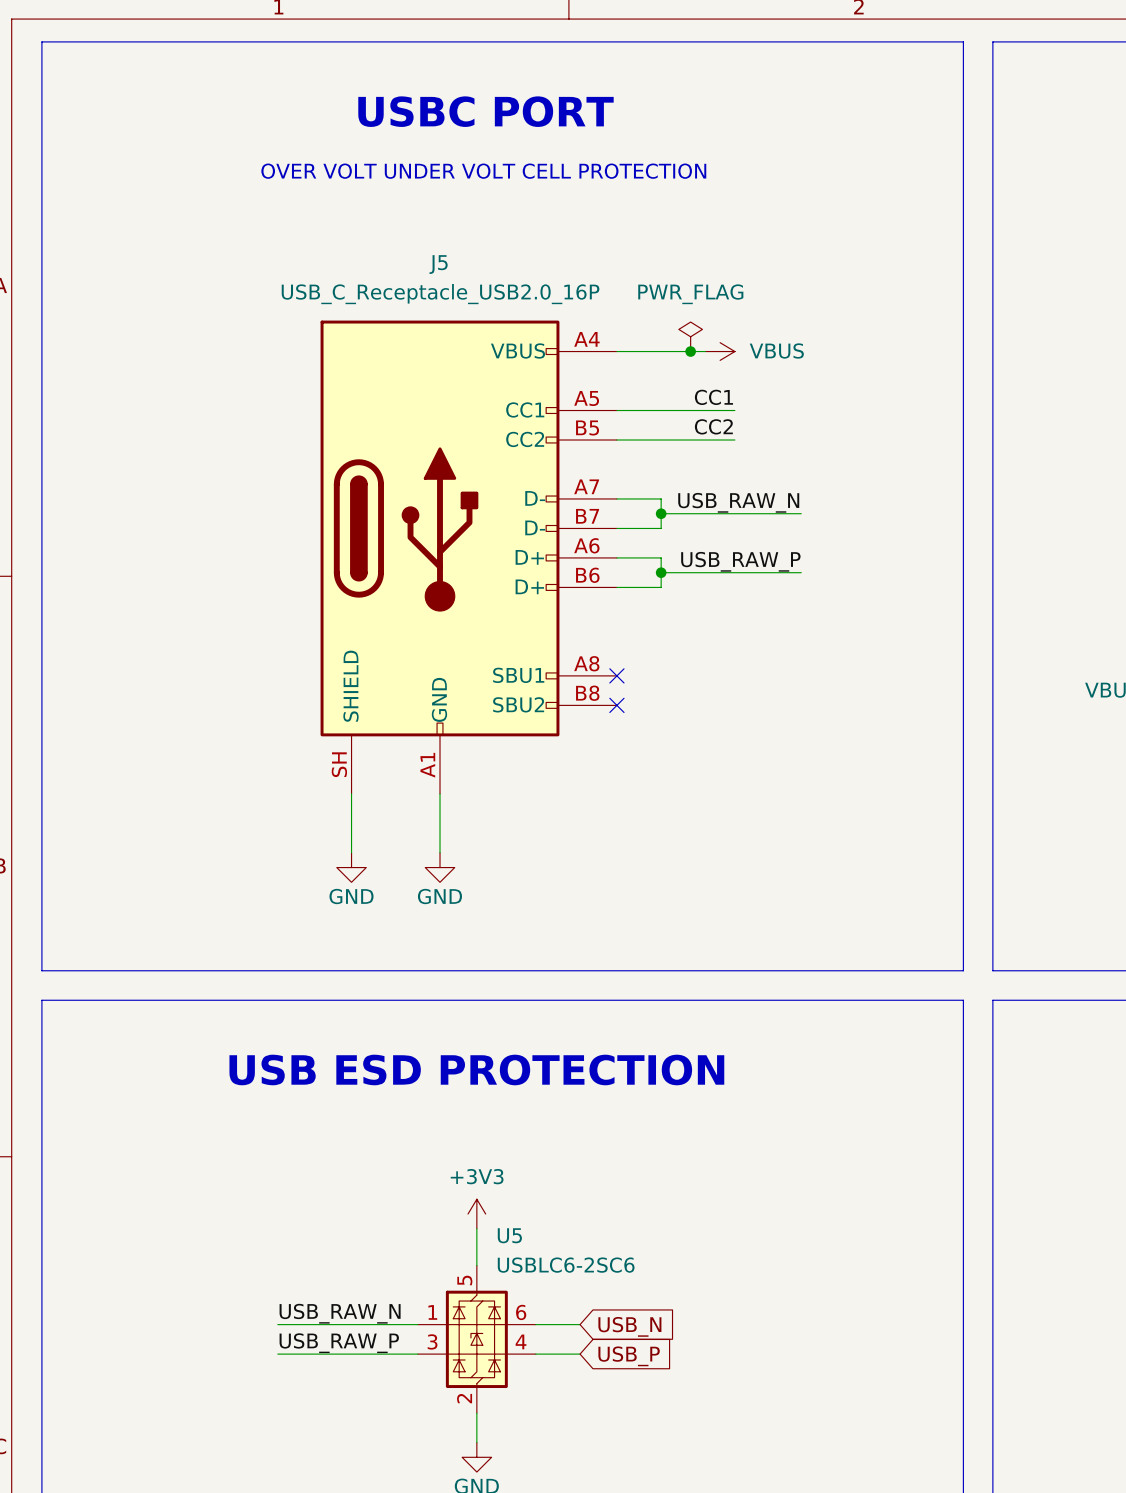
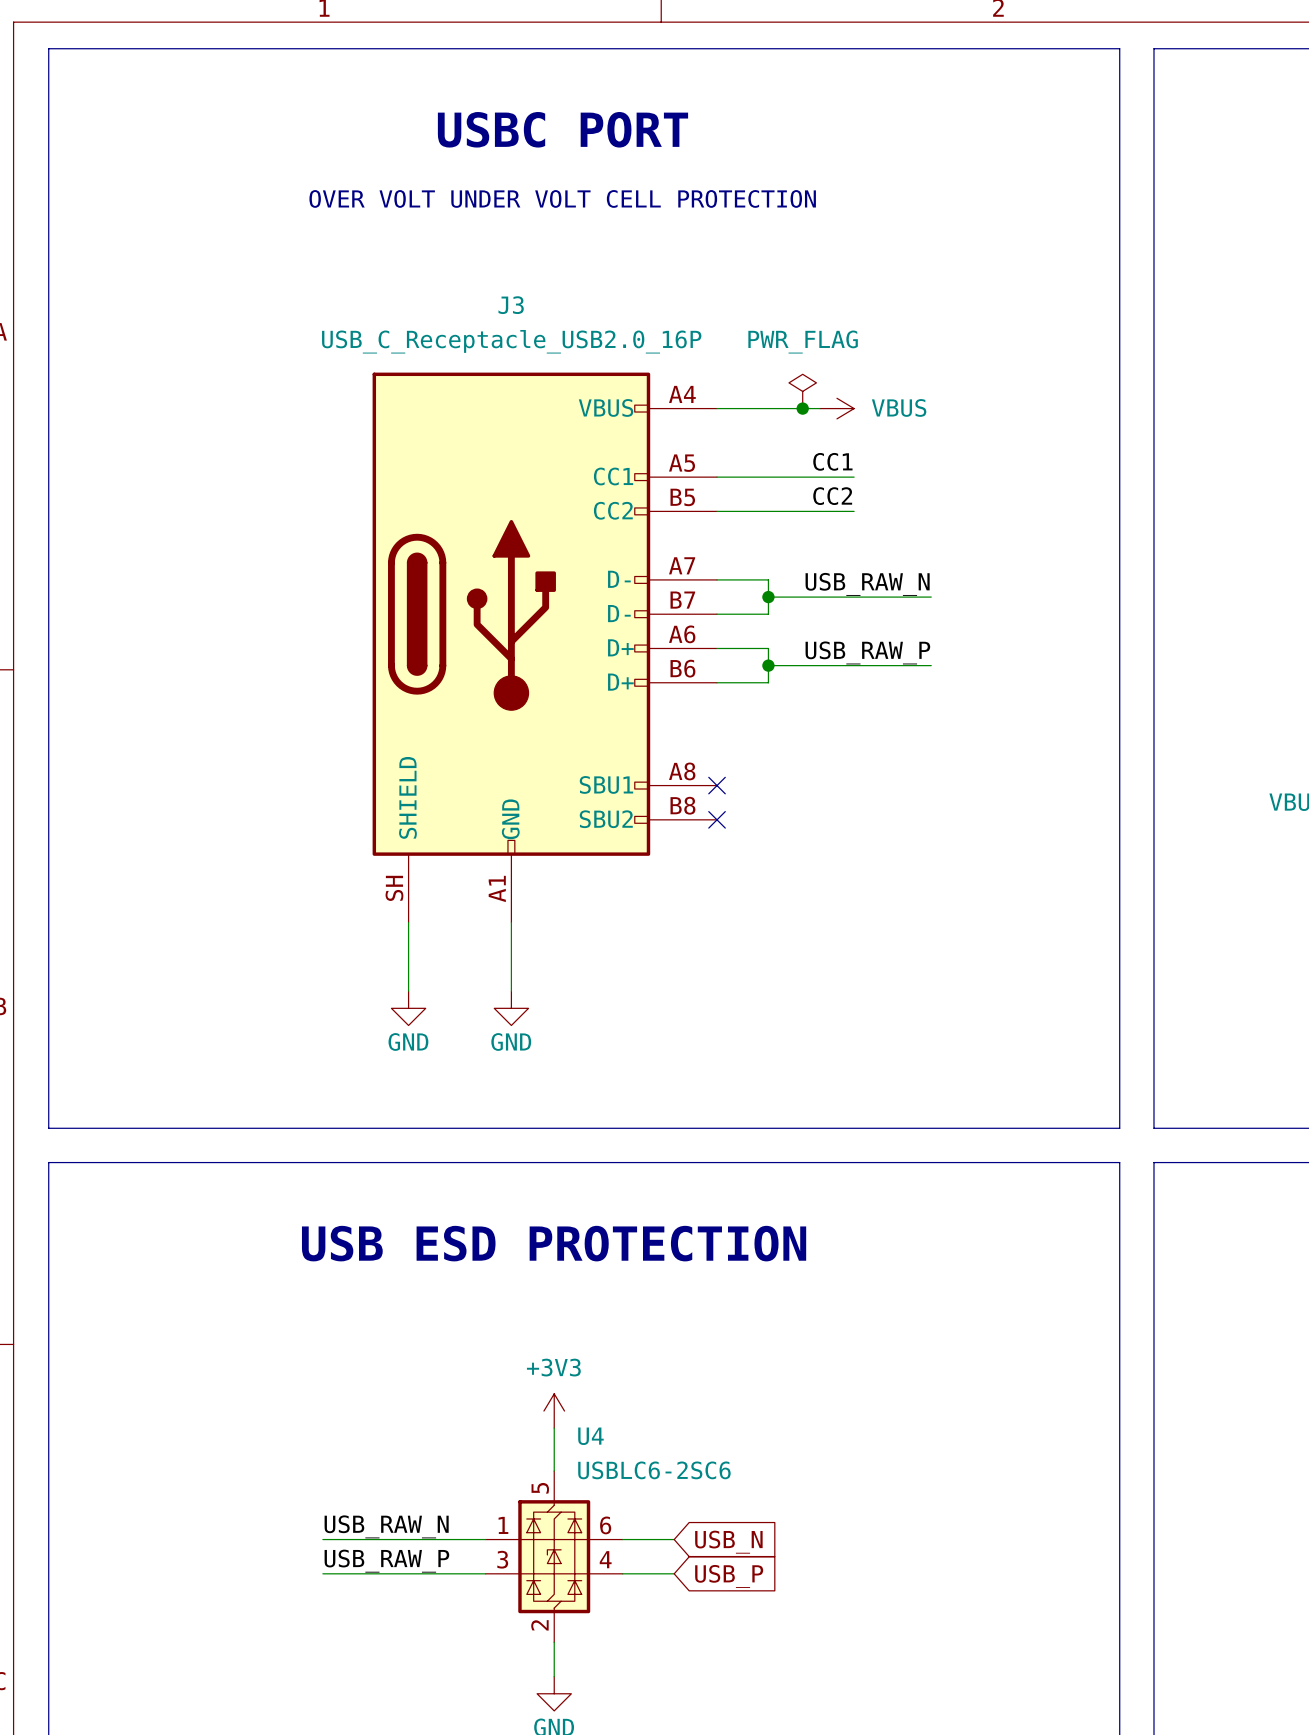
J5 name: J5 (438, 264) -> J3 (511, 305)
U5 name: U5 (509, 1235) -> U4 (590, 1436)

